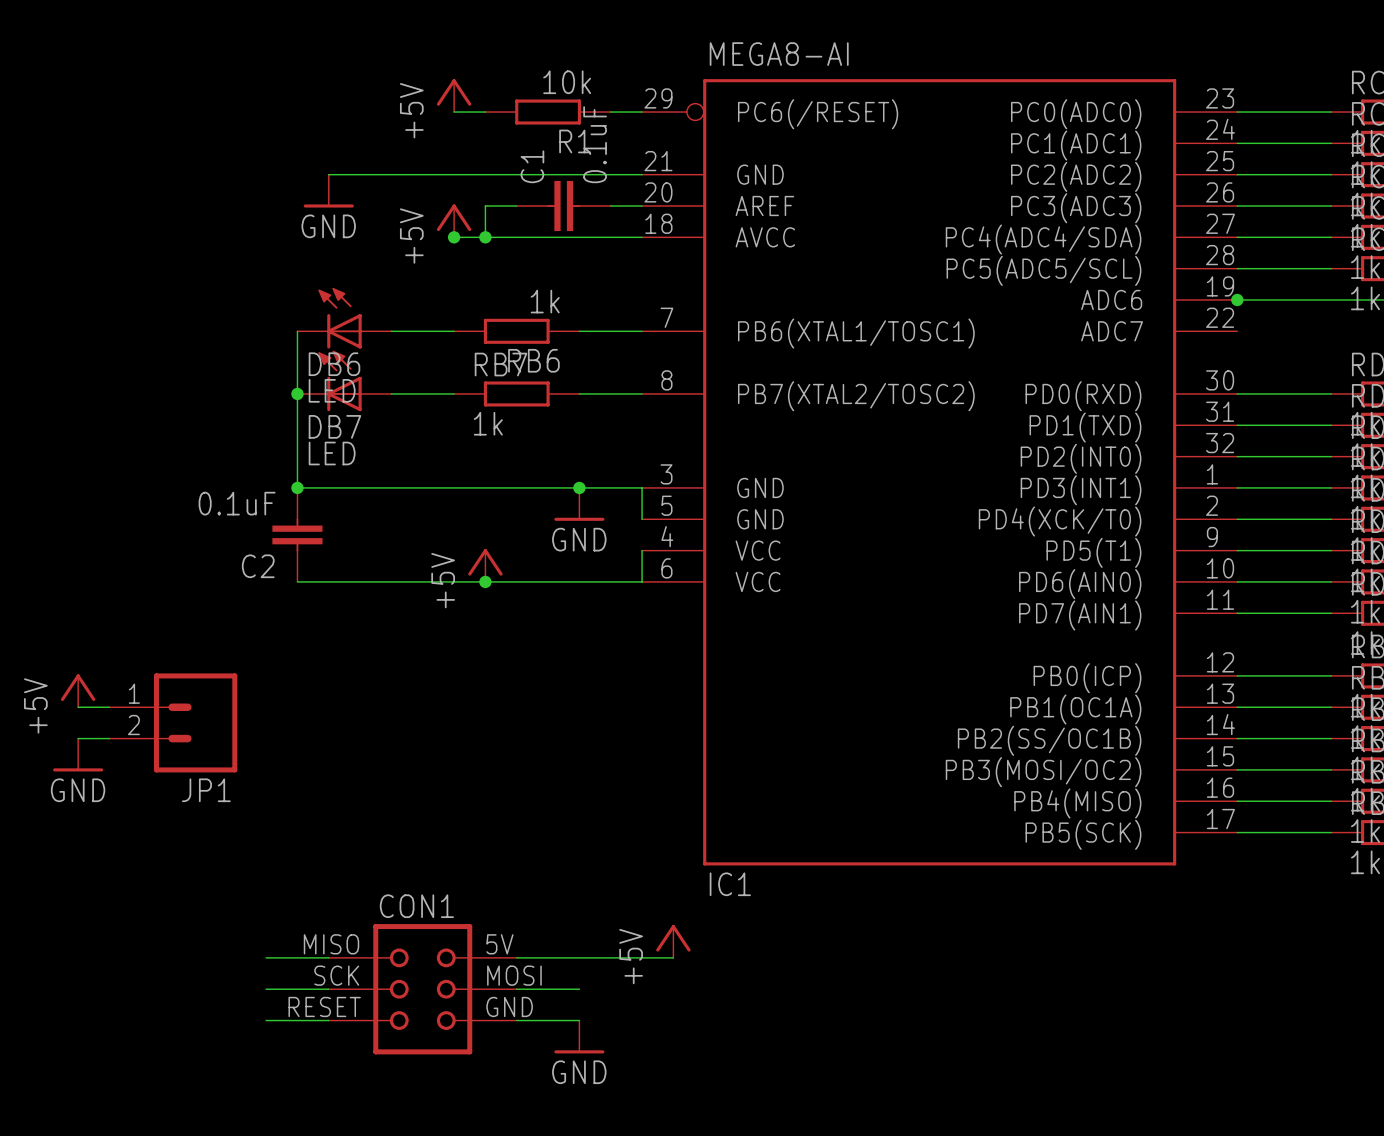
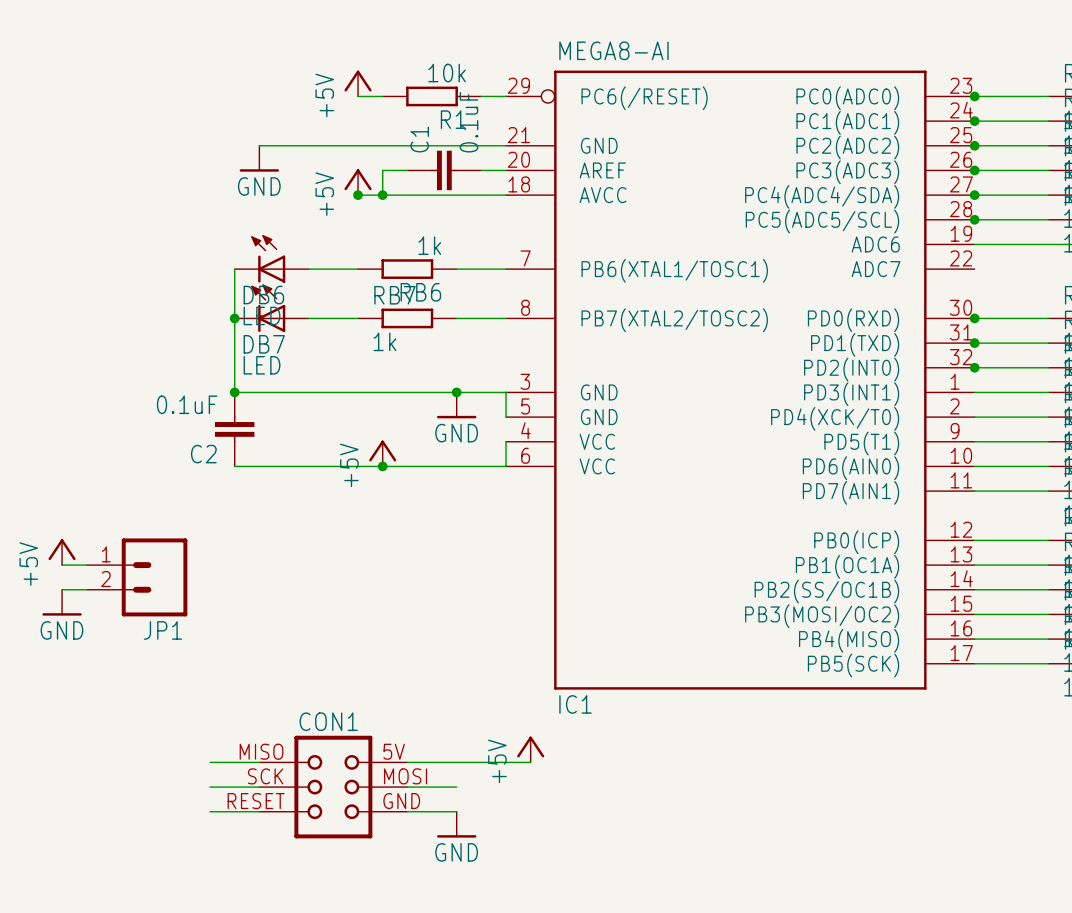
junction: none -> (974, 96)
junction: none -> (974, 121)
junction: none -> (974, 145)
junction: none -> (974, 170)
junction: none -> (974, 195)
junction: none -> (974, 219)
junction: (1237, 299) -> none
junction: none -> (974, 318)
junction: none -> (974, 343)
junction: none -> (974, 367)

